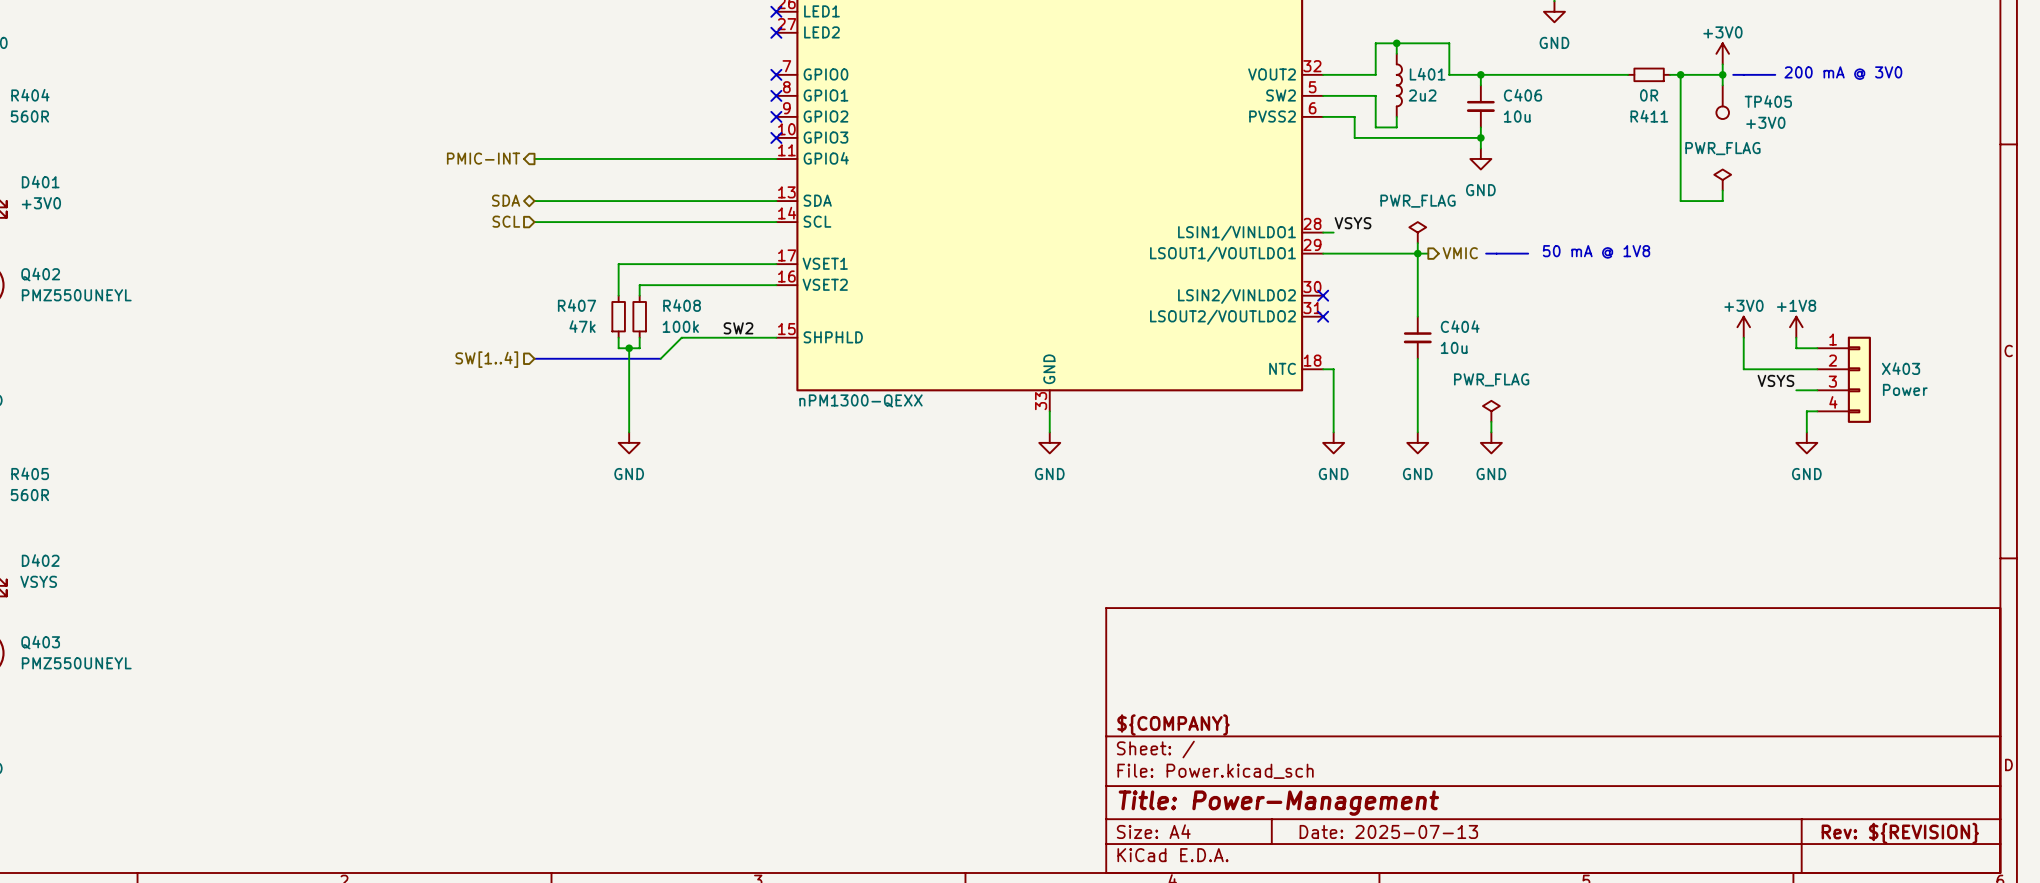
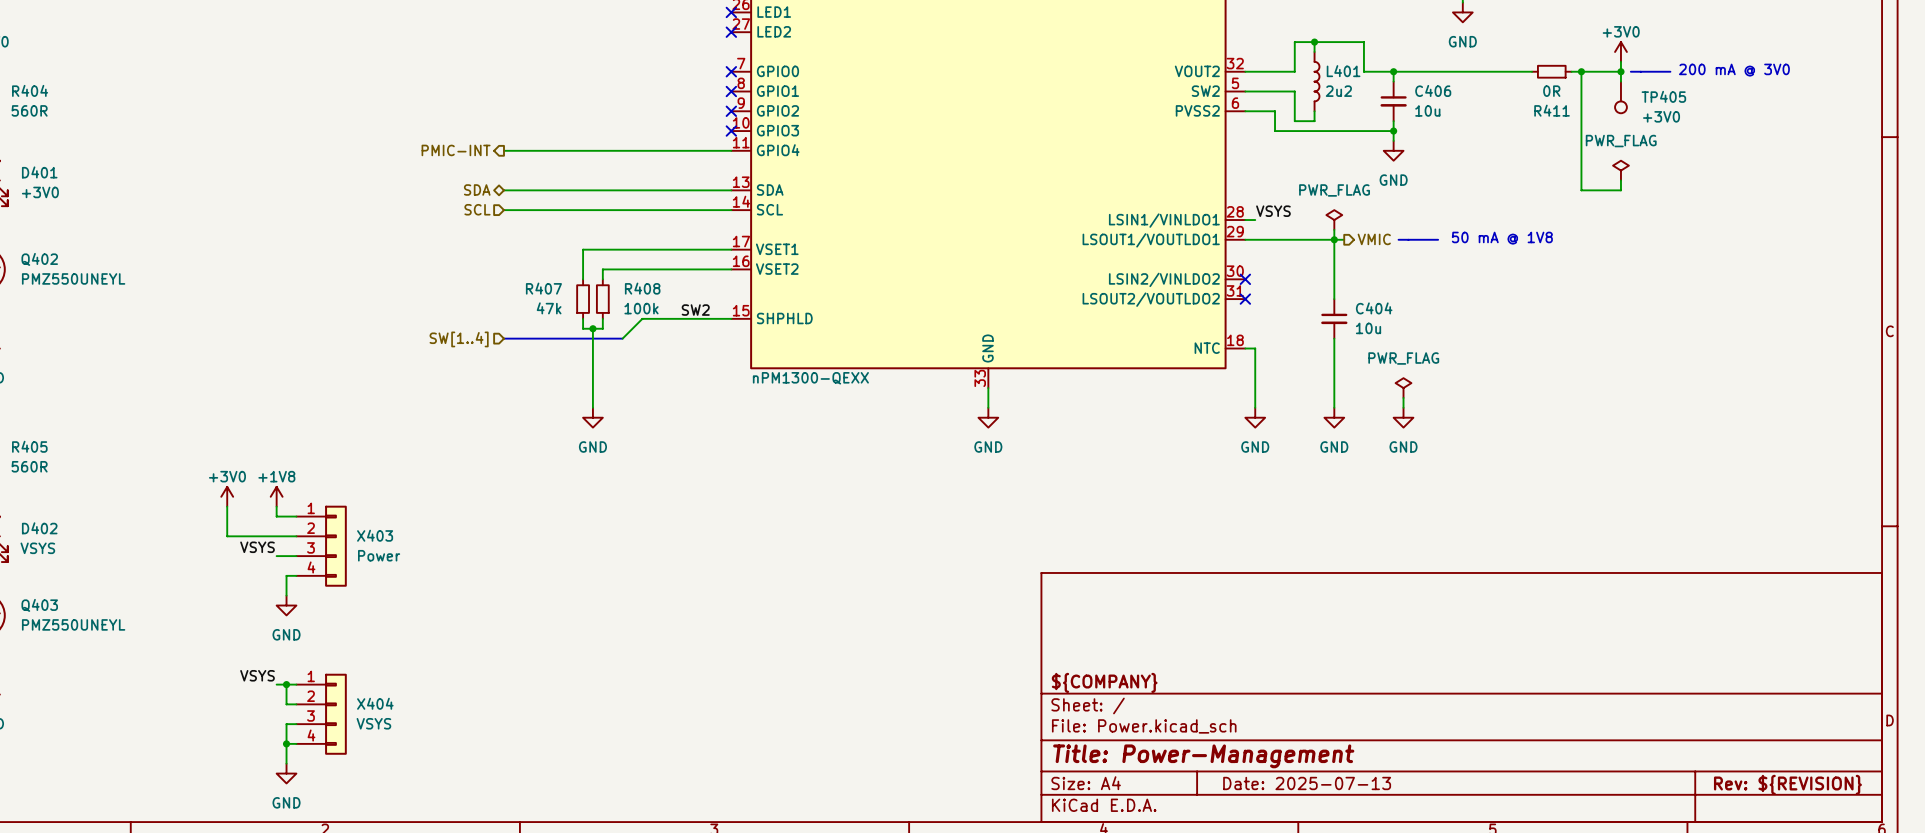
power symbol: +3V0 (1743, 327) -> none
power symbol: +1V8 (1796, 327) -> none
wire: (1743, 337) (1743, 369) (1817, 369) -> none
wire: (1796, 337) (1796, 348) (1817, 348) -> none
X403 position: (1844, 379) -> (321, 546)
label: VSYS (1775, 380) -> none
wire: (1796, 390) (1817, 390) -> none
wire: (1817, 411) (1806, 411) (1806, 432) -> none
power symbol: GND (1806, 442) -> none
power symbol: none -> +3V0 (227, 496)
power symbol: none -> +1V8 (276, 496)
wire: none -> (227, 506) (227, 536) (296, 536)
wire: none -> (276, 506) (276, 516) (296, 516)
label: none -> VSYS (257, 547)
wire: none -> (276, 556) (296, 556)
wire: none -> (296, 575) (286, 575) (286, 595)
power symbol: none -> GND (286, 605)
label: none -> VSYS (257, 675)
wire: none -> (276, 684) (296, 684)
wire: none -> (286, 684) (286, 704) (296, 704)
junction: none -> (286, 684)
X404: none -> VSYS (321, 714)
wire: none -> (296, 724) (286, 724) (286, 763)
wire: none -> (286, 743) (296, 743)
junction: none -> (286, 743)
power symbol: none -> GND (286, 773)

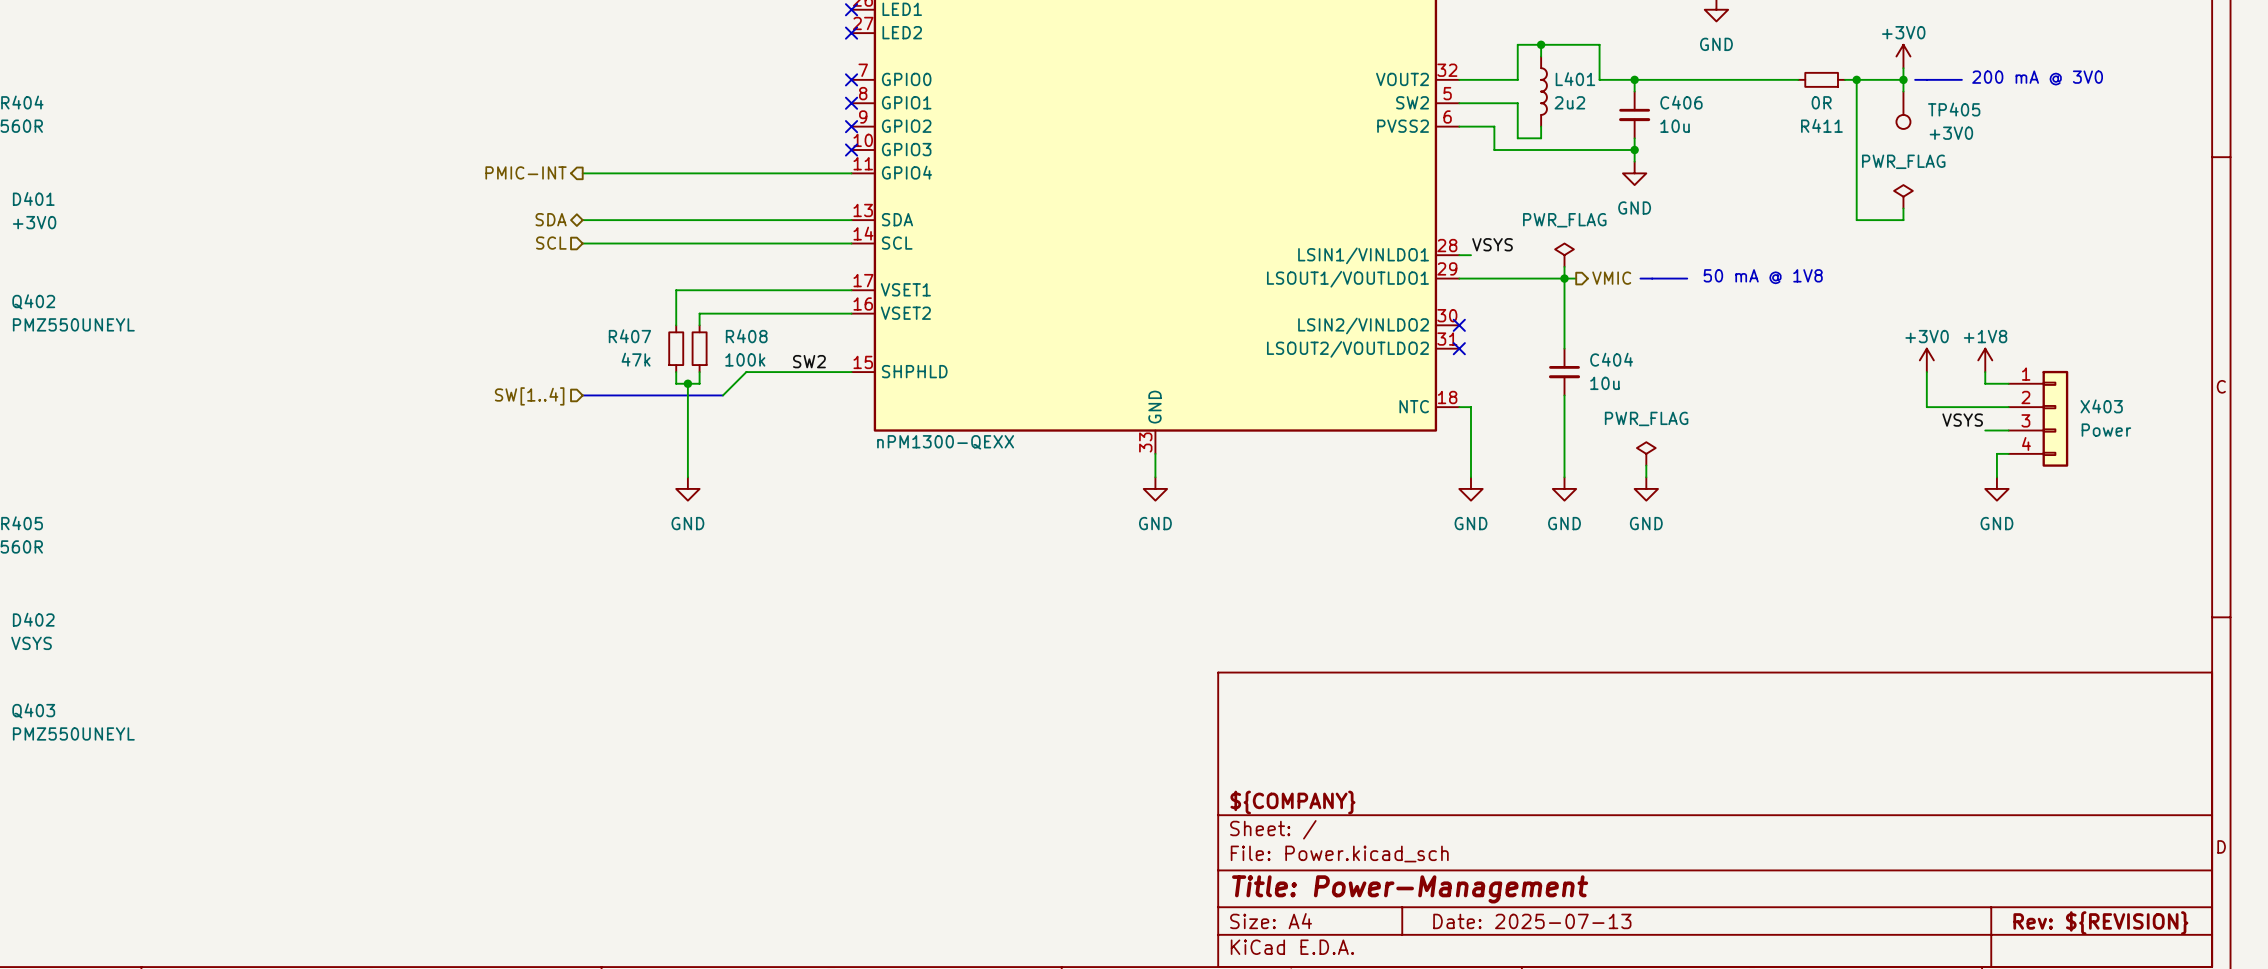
power symbol: none -> +3V0 (1926, 360)
power symbol: none -> +1V8 (1985, 360)
wire: none -> (1926, 372) (1926, 407) (2008, 407)
wire: none -> (1985, 372) (1985, 383) (2008, 383)
label: none -> VSYS (1962, 420)
wire: none -> (1985, 430) (2008, 430)
wire: none -> (2008, 453) (1996, 453) (1996, 477)
power symbol: none -> GND (1996, 488)
power symbol: +3V0 (227, 496) -> none
power symbol: +1V8 (276, 496) -> none
wire: (227, 506) (227, 536) (296, 536) -> none
wire: (276, 506) (276, 516) (296, 516) -> none
X403 position: (321, 546) -> (2038, 418)
label: VSYS (257, 547) -> none
wire: (276, 556) (296, 556) -> none
wire: (296, 575) (286, 575) (286, 595) -> none
power symbol: GND (286, 605) -> none
label: VSYS (257, 675) -> none
wire: (276, 684) (296, 684) -> none
wire: (286, 684) (286, 704) (296, 704) -> none
junction: (286, 684) -> none
X404: VSYS (321, 714) -> none
wire: (296, 724) (286, 724) (286, 763) -> none
wire: (286, 743) (296, 743) -> none
junction: (286, 743) -> none
power symbol: GND (286, 773) -> none

